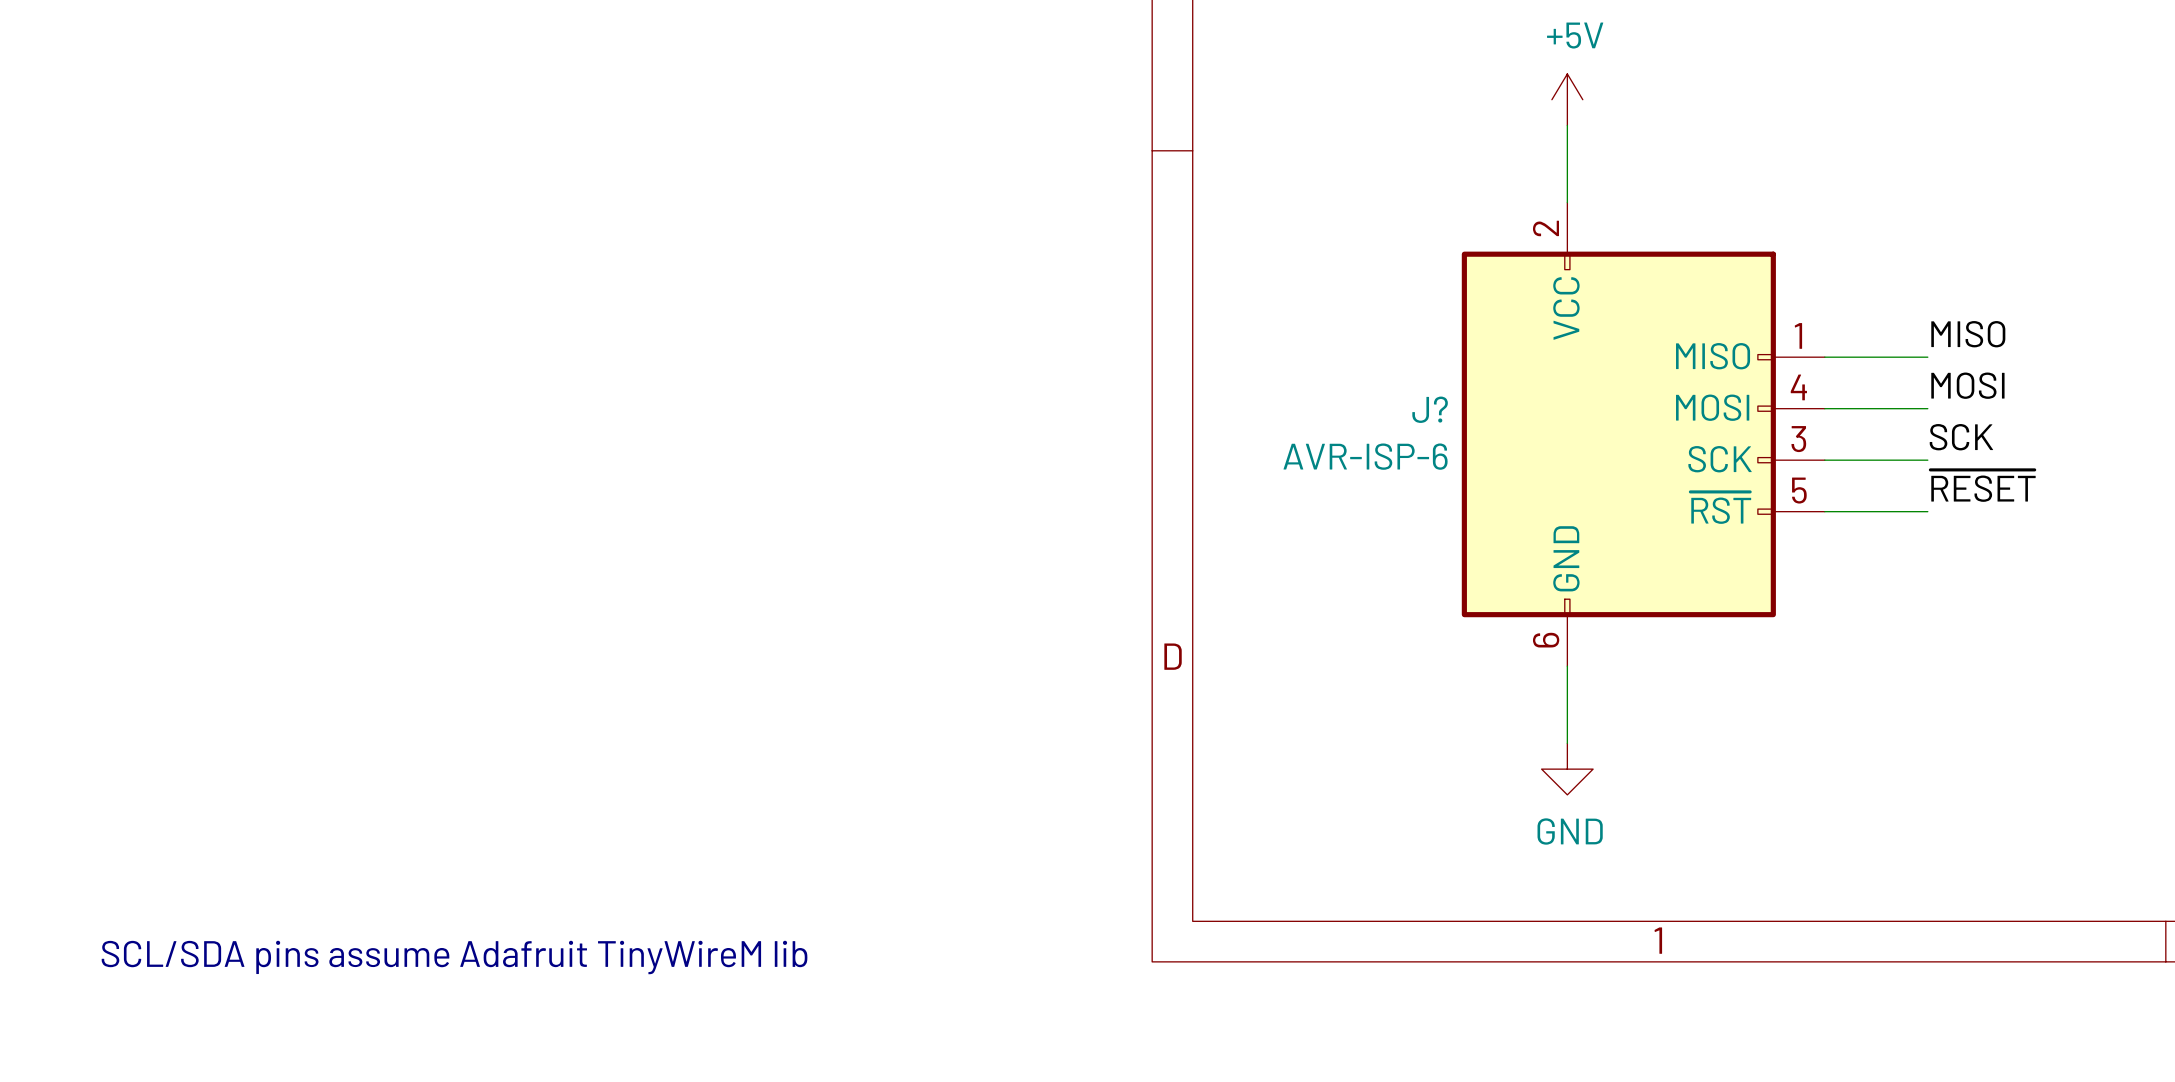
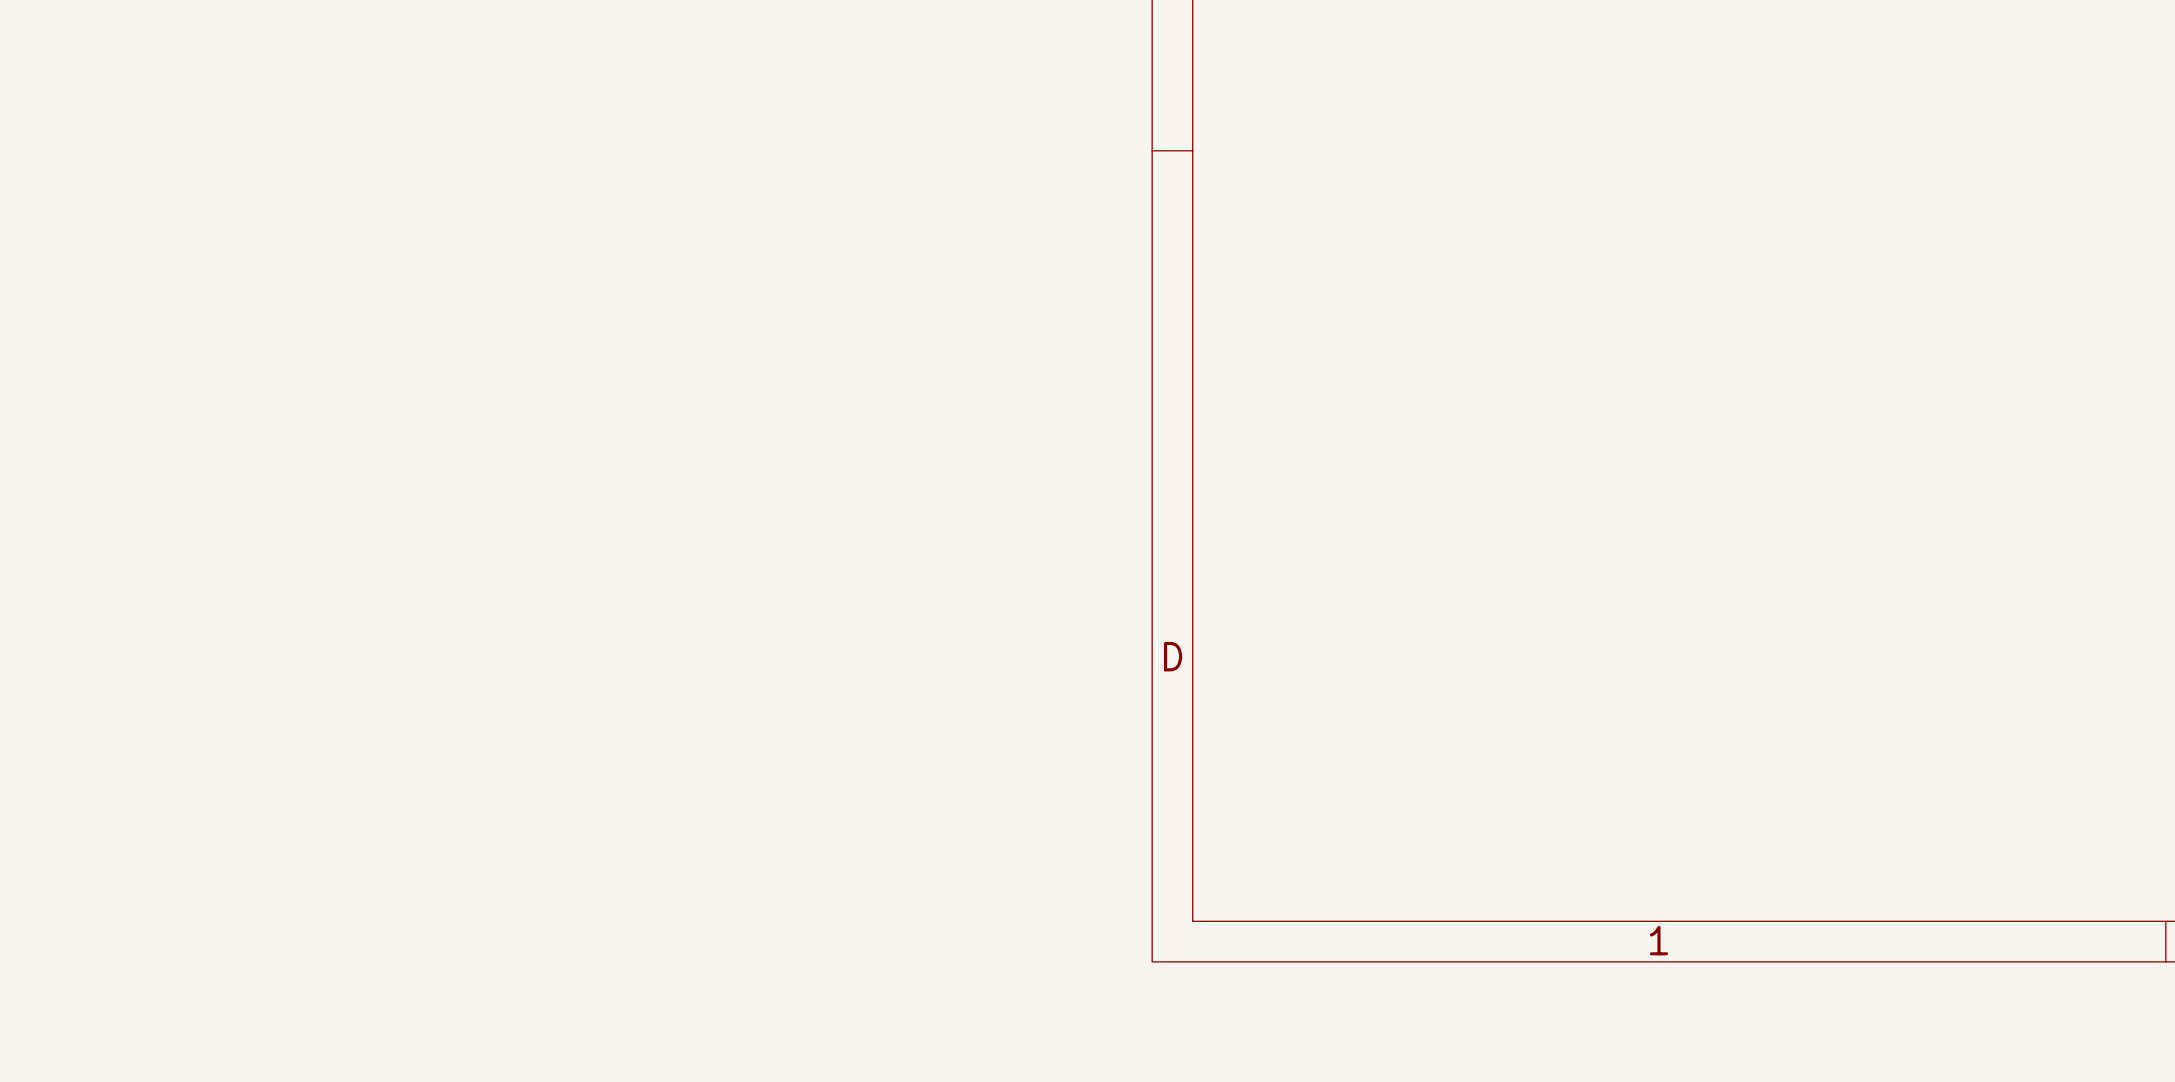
power symbol: +5V (1567, 99) -> none
wire: (1567, 125) (1567, 202) -> none
label: MISO (1968, 334) -> none
wire: (1824, 357) (1927, 357) -> none
label: MOSI (1967, 385) -> none
wire: (1824, 408) (1927, 408) -> none
J?: AVR-ISP-6 (1643, 434) -> none
label: SCK (1961, 437) -> none
wire: (1824, 460) (1927, 460) -> none
label: ~{RESET} (1983, 485) -> none
wire: (1824, 511) (1927, 511) -> none
wire: (1567, 666) (1567, 743) -> none
power symbol: GND (1567, 769) -> none
text: SCL/SDA pins assume Adafruit TinyWireM lib (454, 957) -> none

